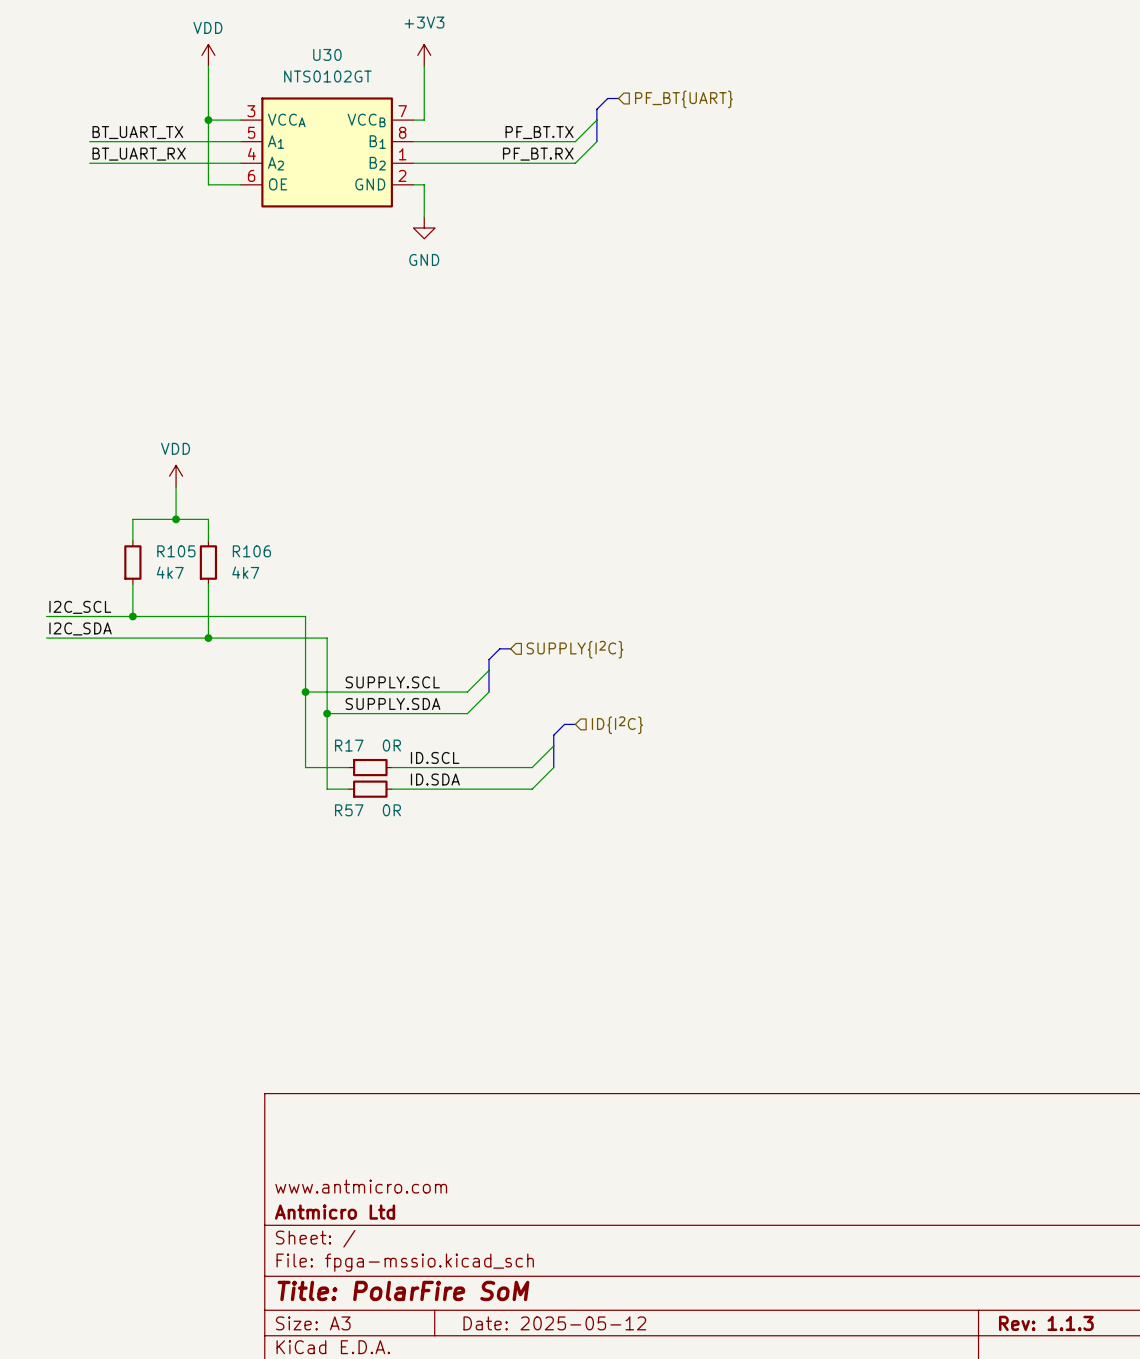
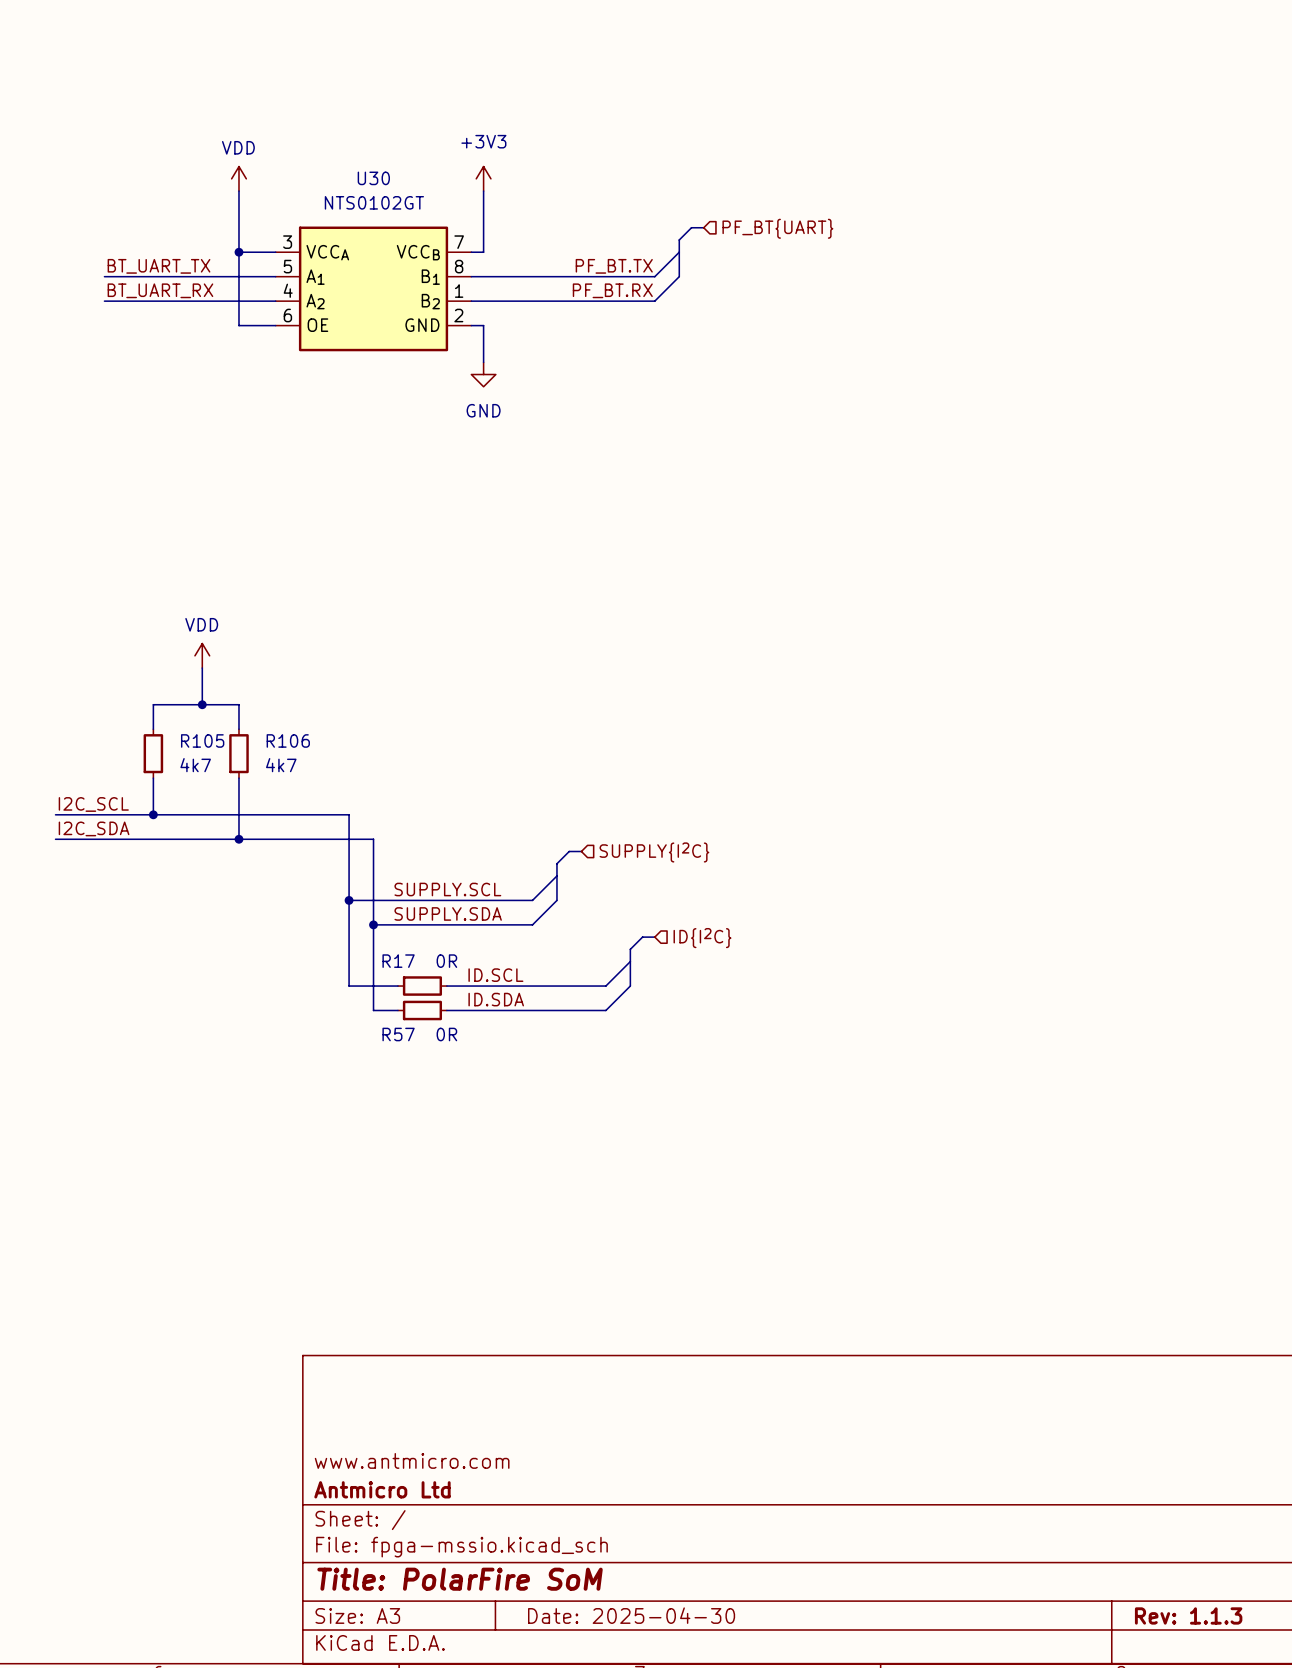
title block: Date: 2025-05-12 (554, 1323) -> Date: 2025-04-30 (631, 1615)

